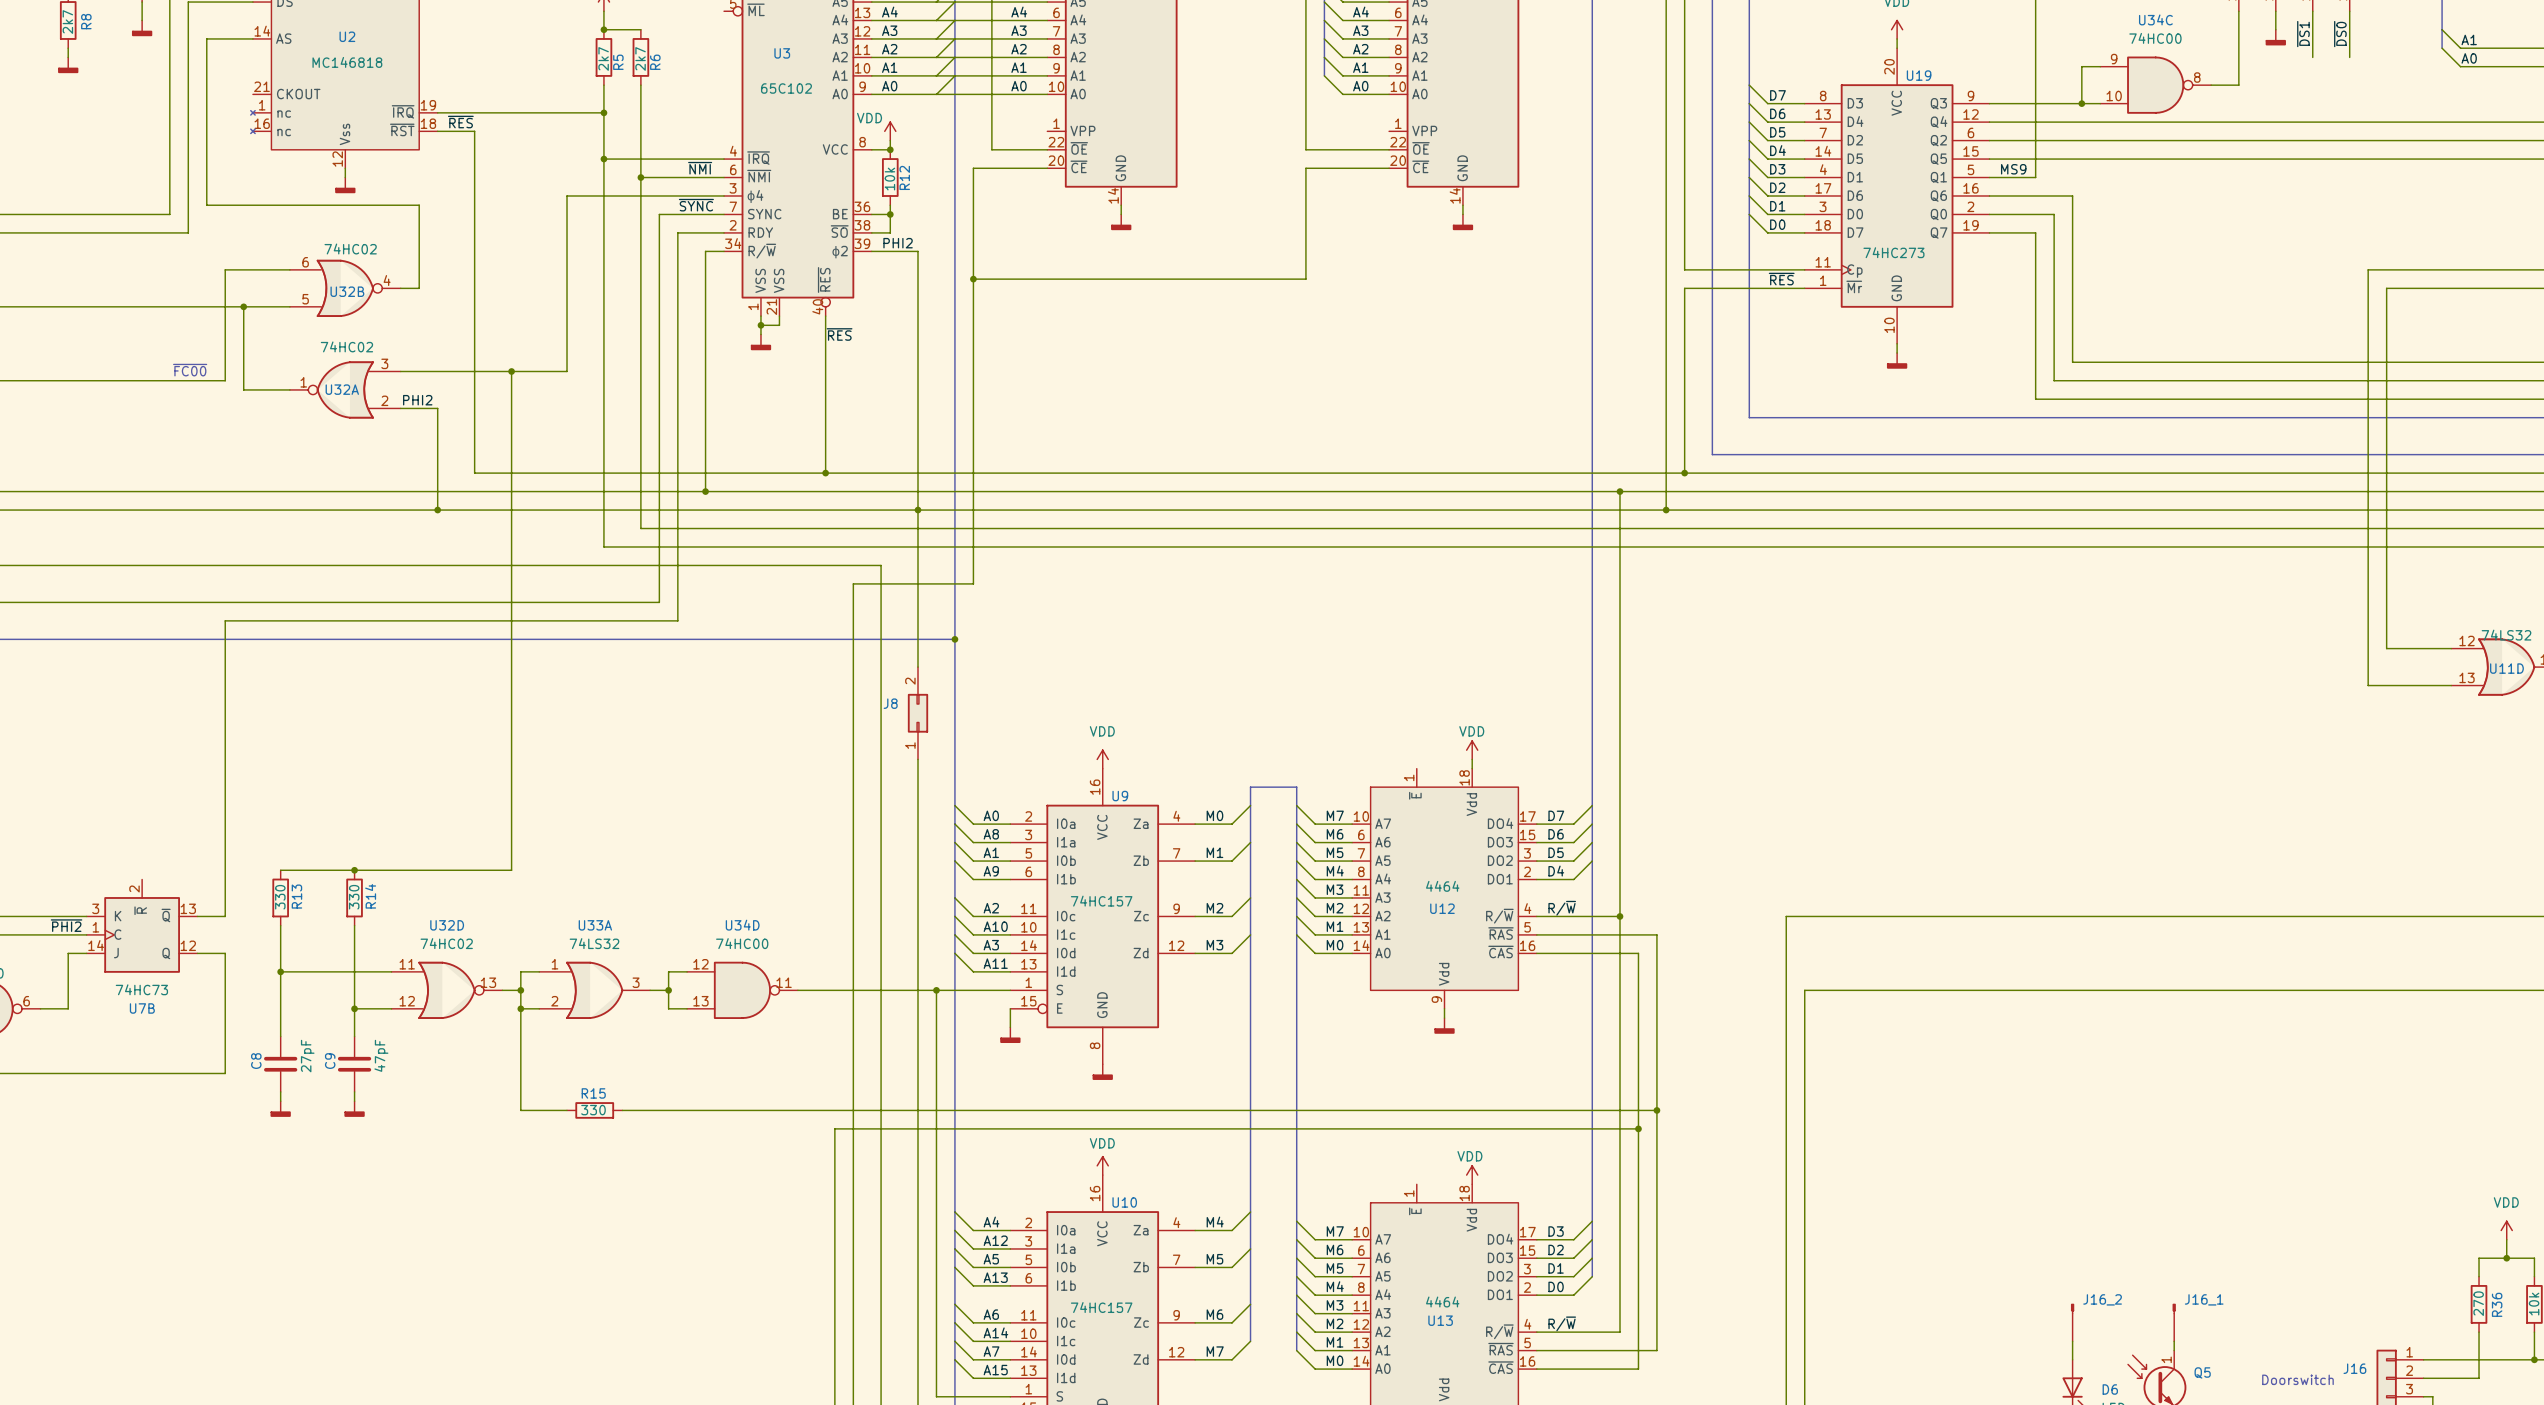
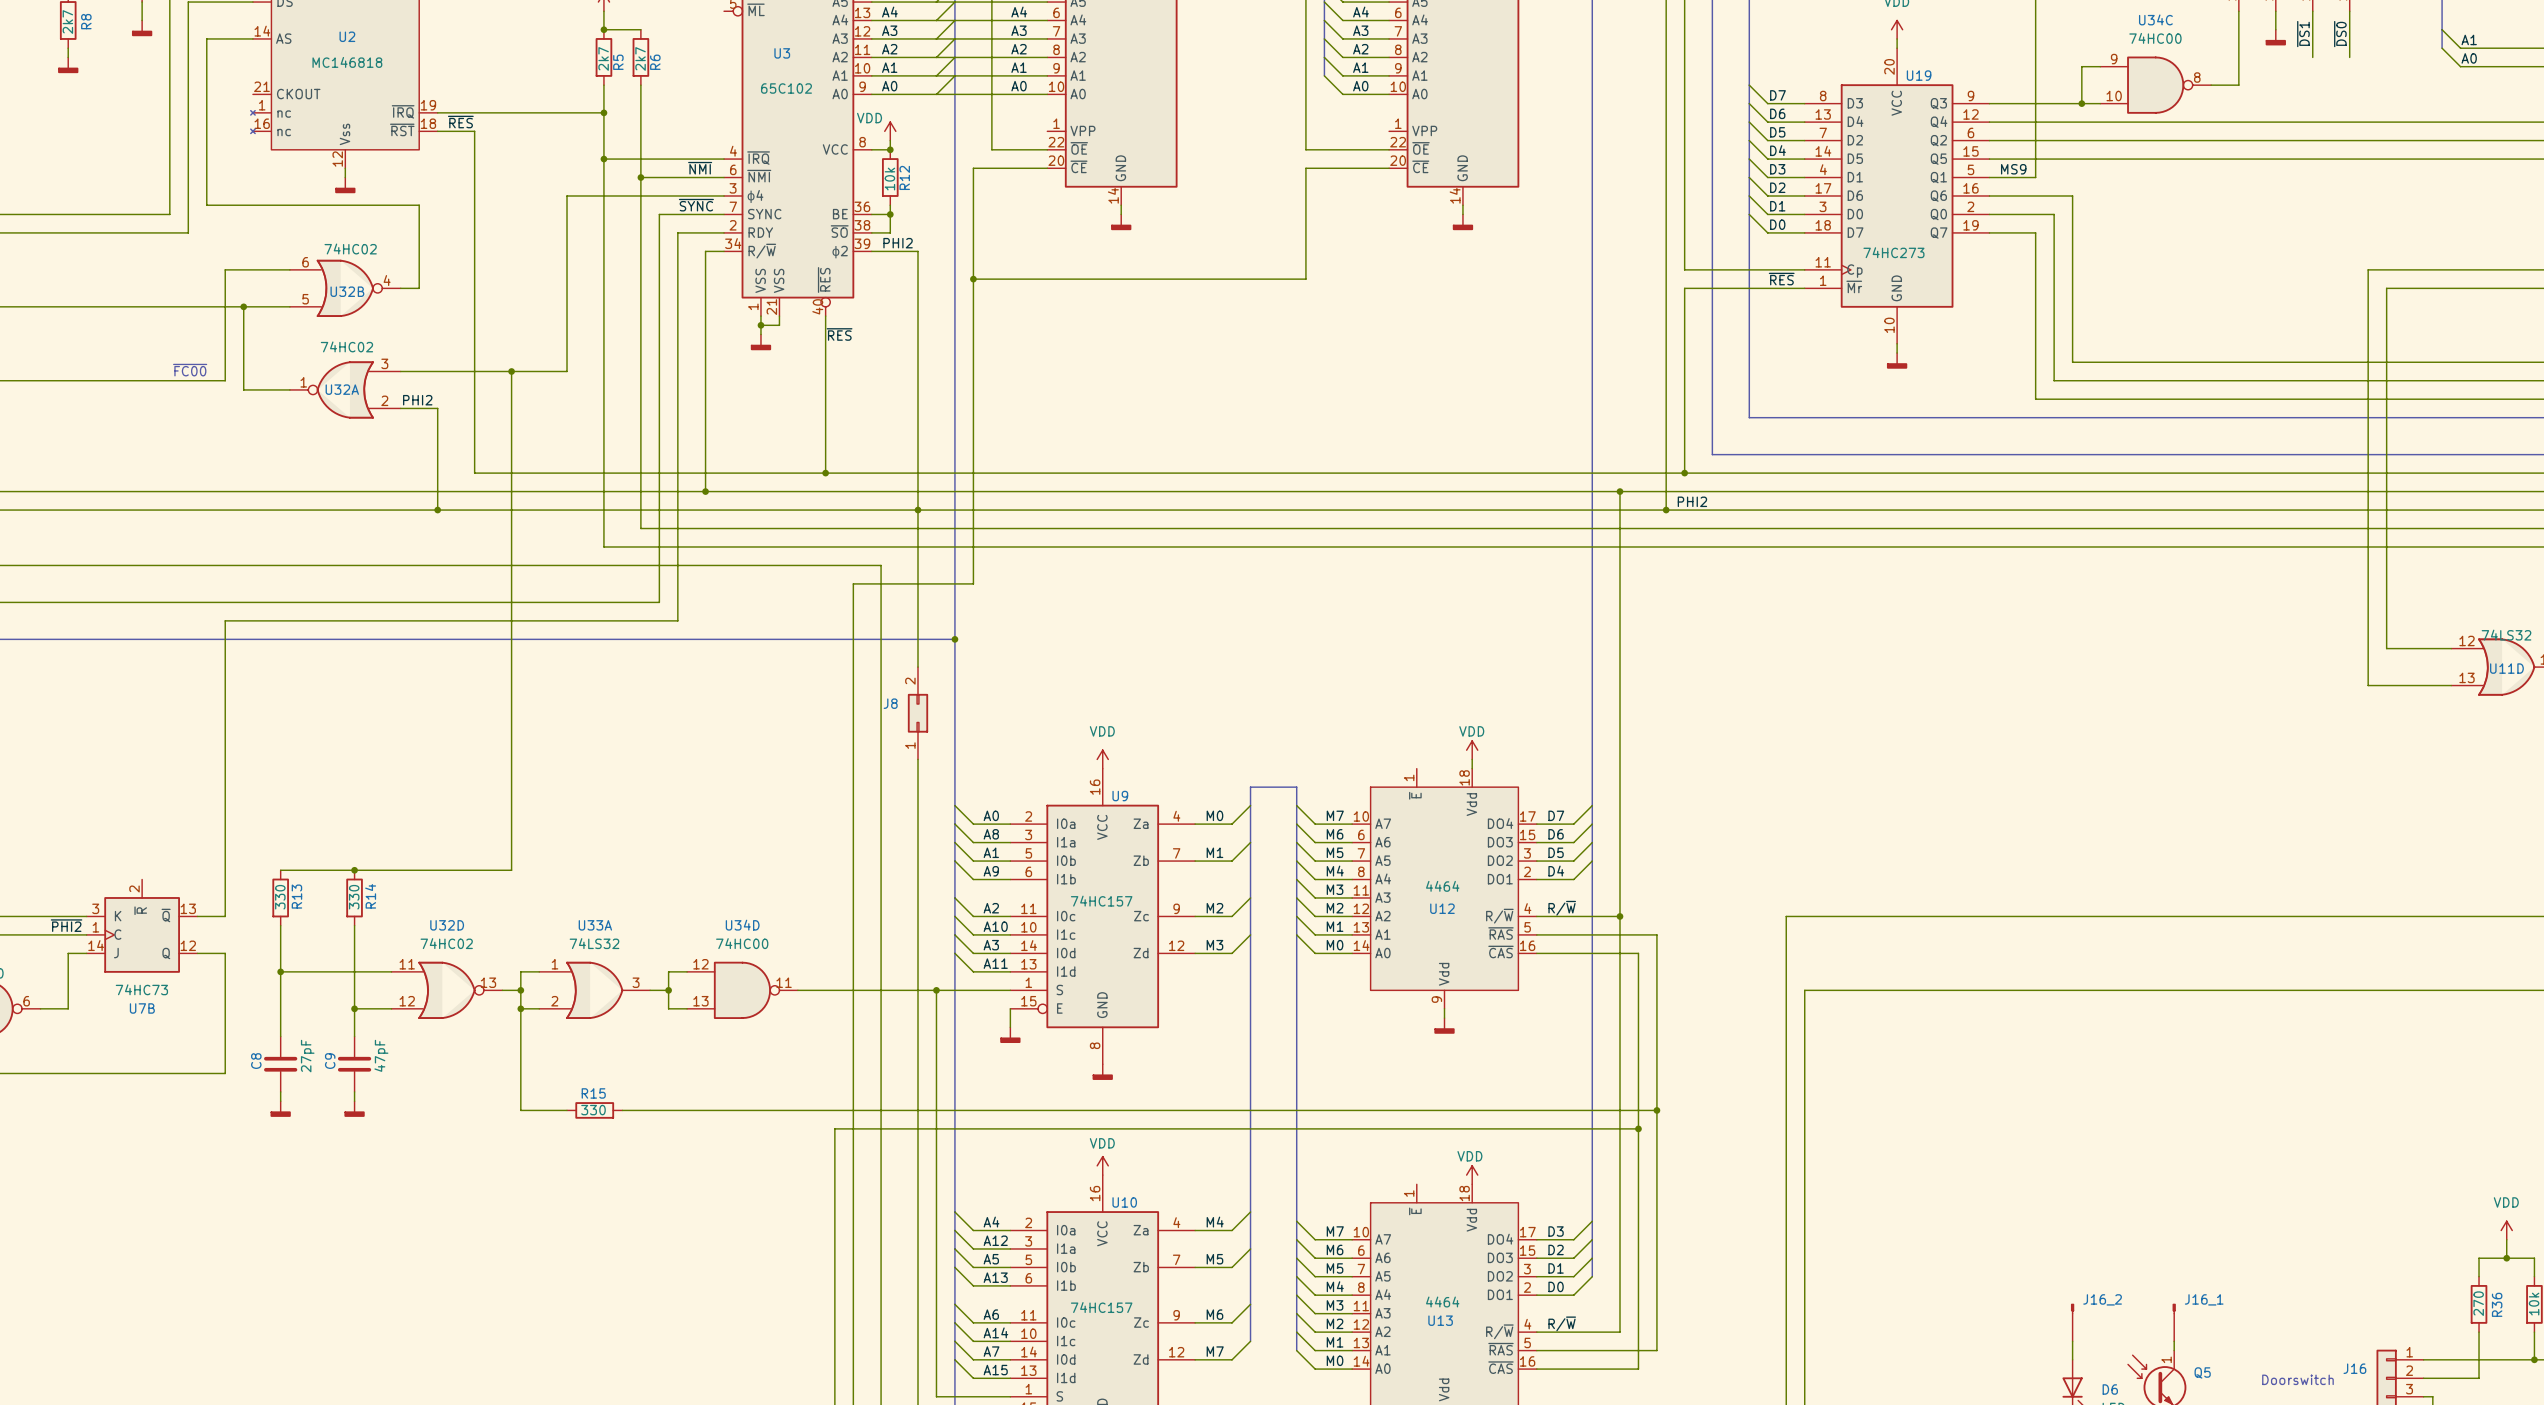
label: none -> PHI2 (1692, 501)

